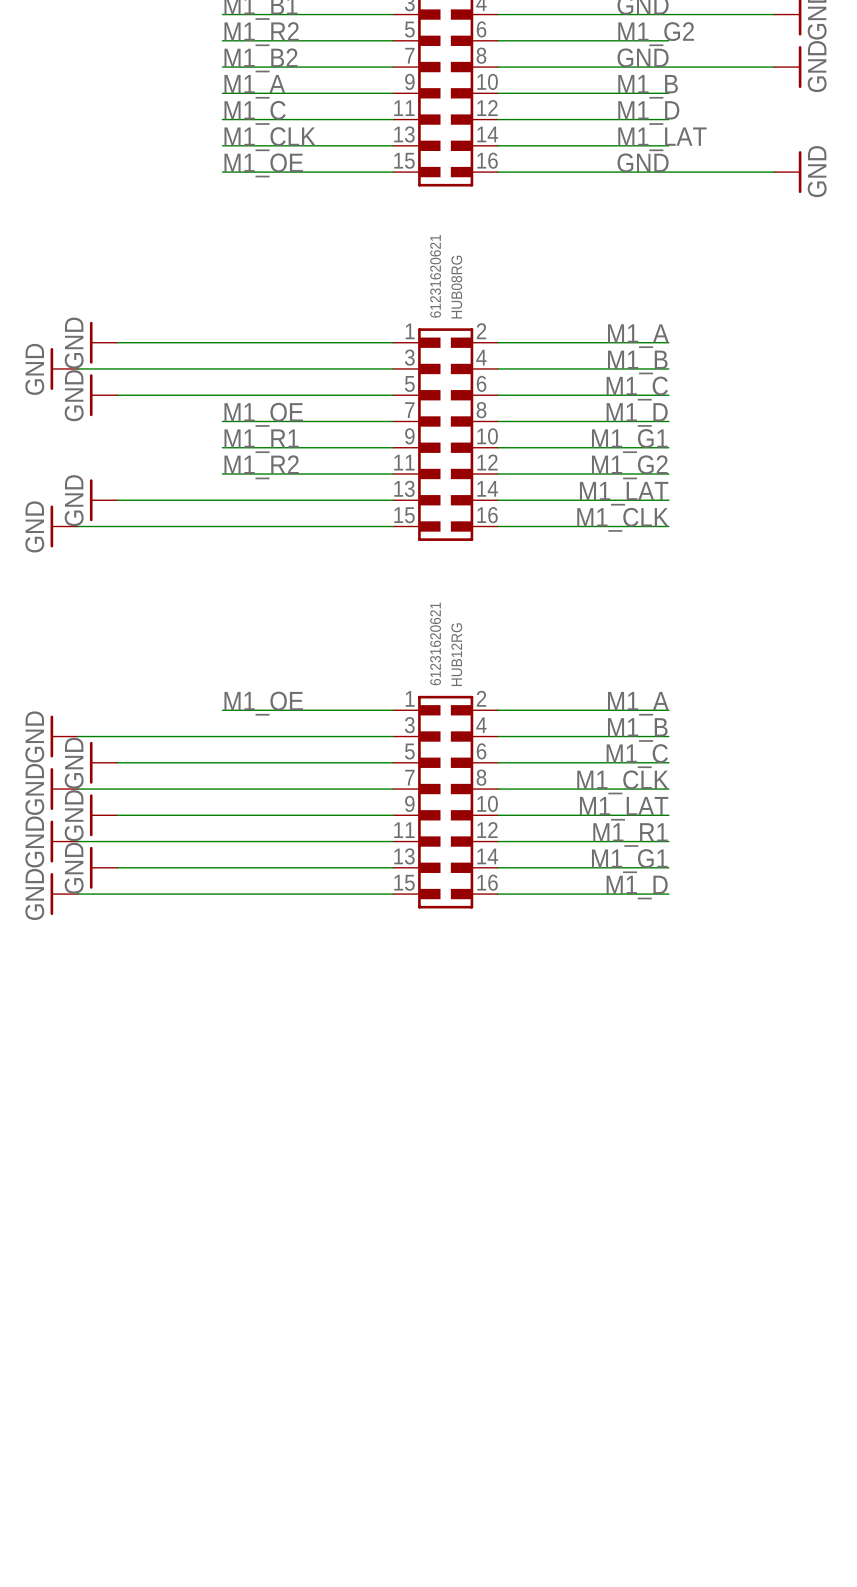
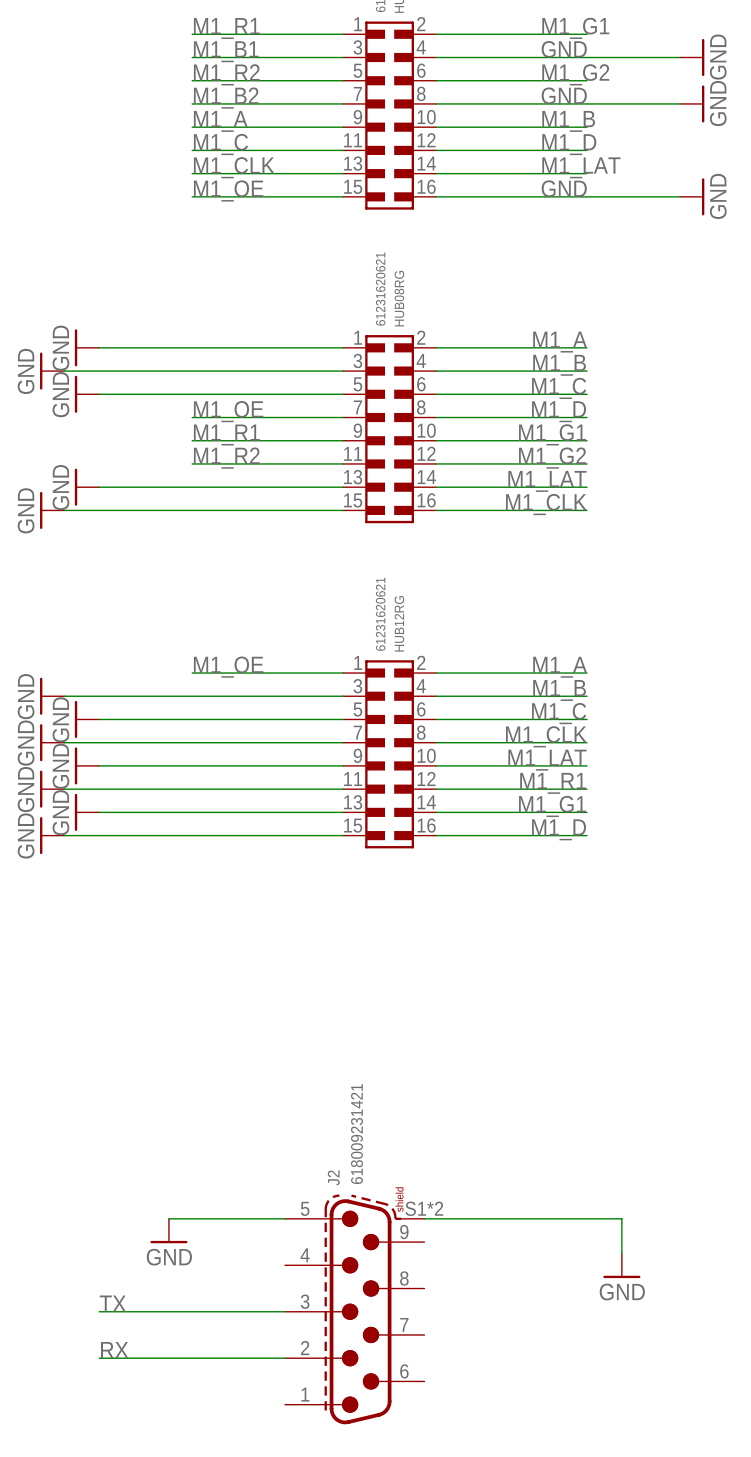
wire: none -> (168, 1218) (285, 1218)
wire: none -> (424, 1218) (621, 1218) (621, 1253)
power symbol: none -> GND (168, 1231)
power symbol: none -> GND (621, 1265)
label: none -> TX (112, 1303)
J2: none -> 618009231421 (354, 1309)
wire: none -> (99, 1311) (285, 1311)
label: none -> RX (114, 1350)
wire: none -> (99, 1358) (285, 1358)

